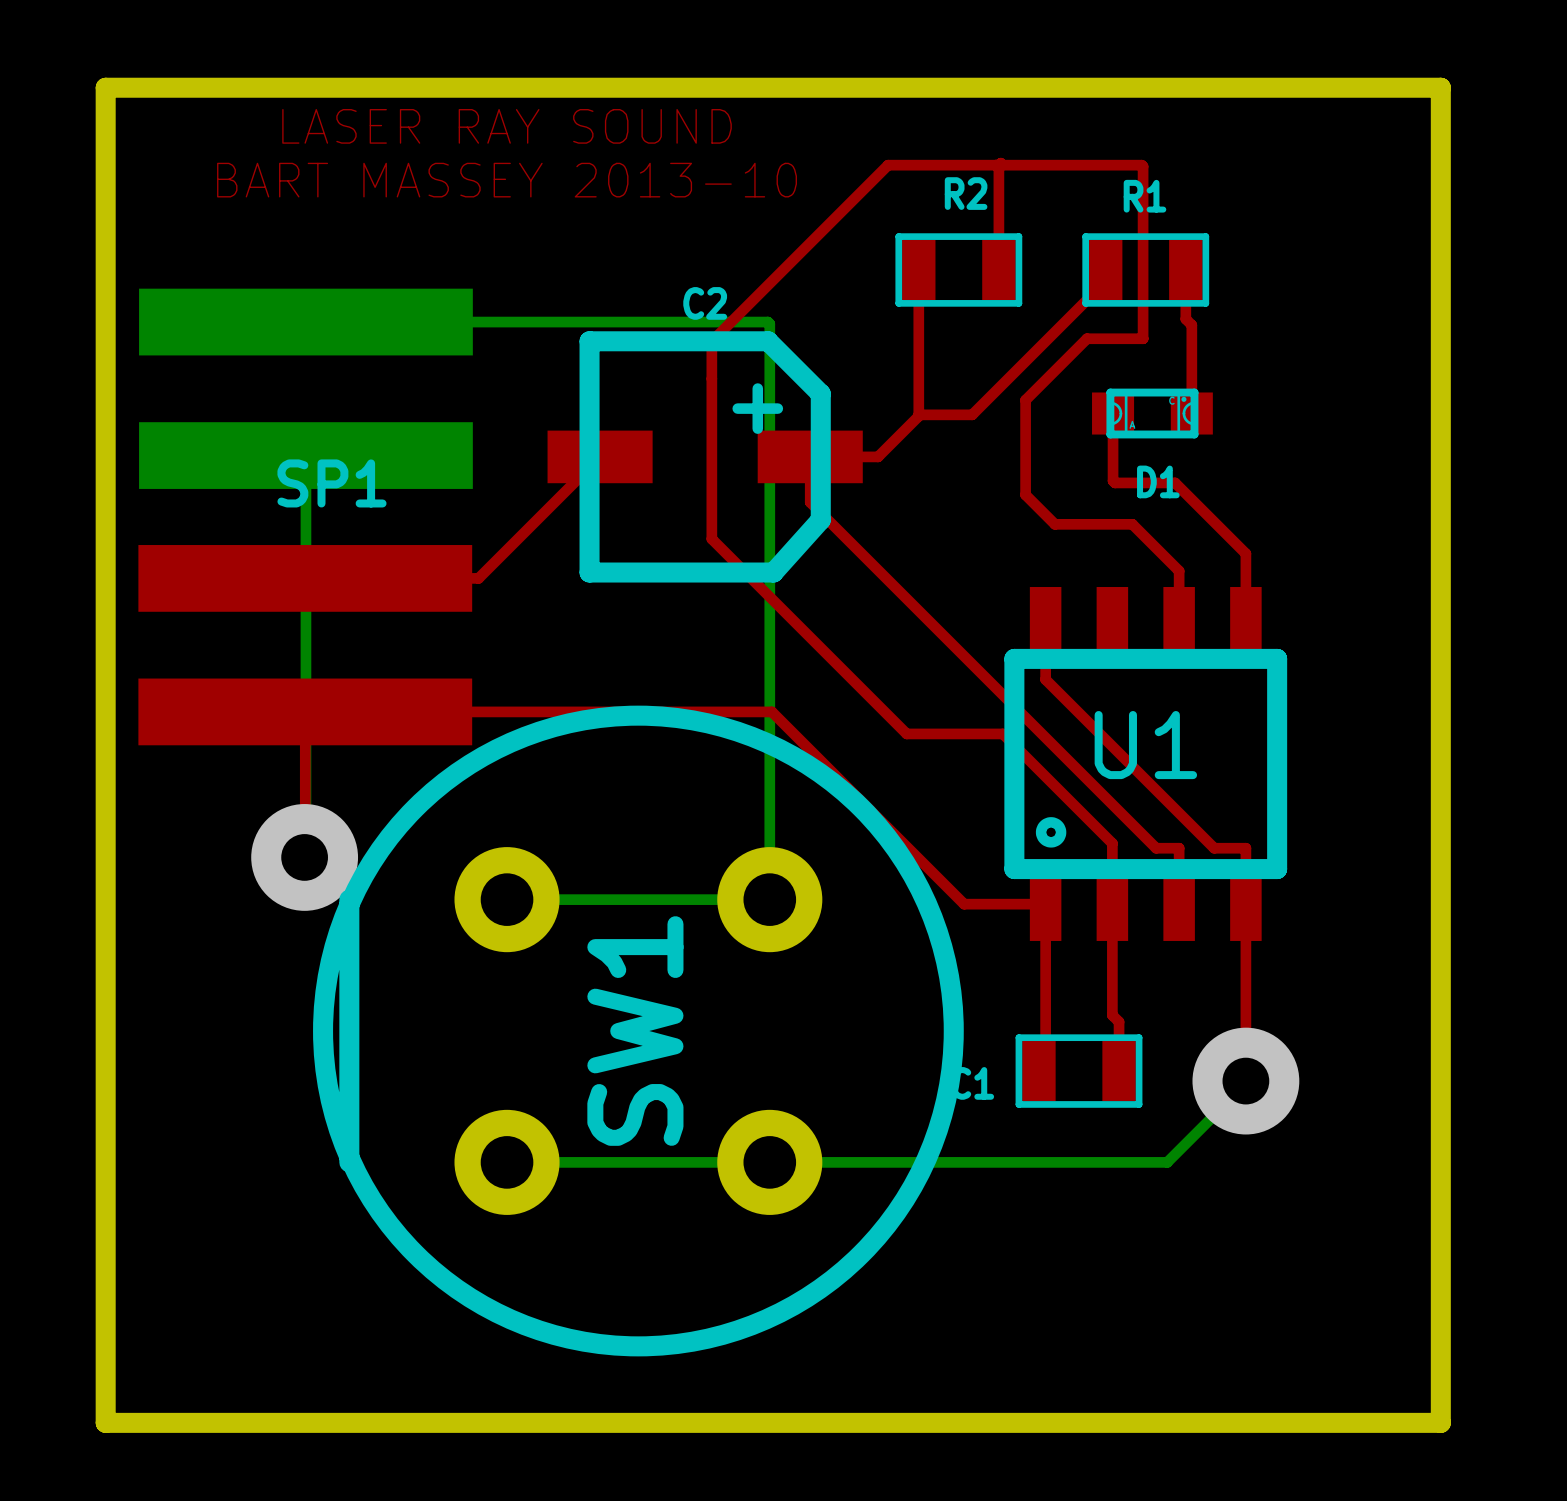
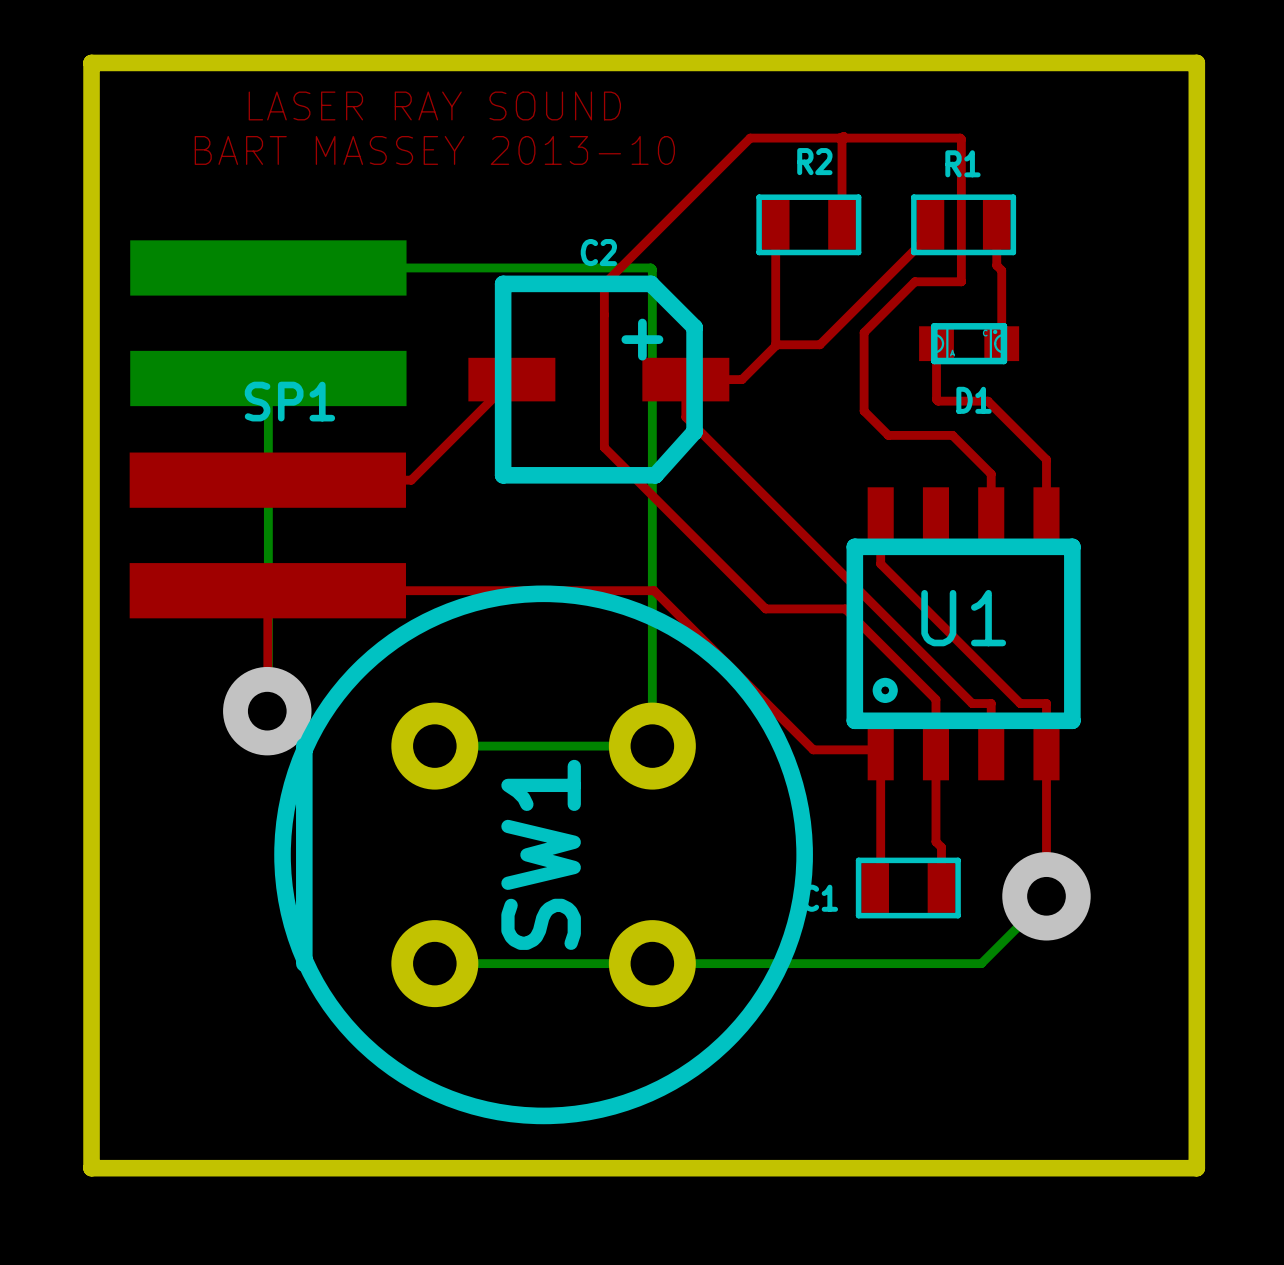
board edge: (105, 87) (105, 1422) (1440, 1422) (1440, 87) (105, 87) -> (91, 62) (91, 1168) (1196, 1168) (1196, 62) (91, 62)

